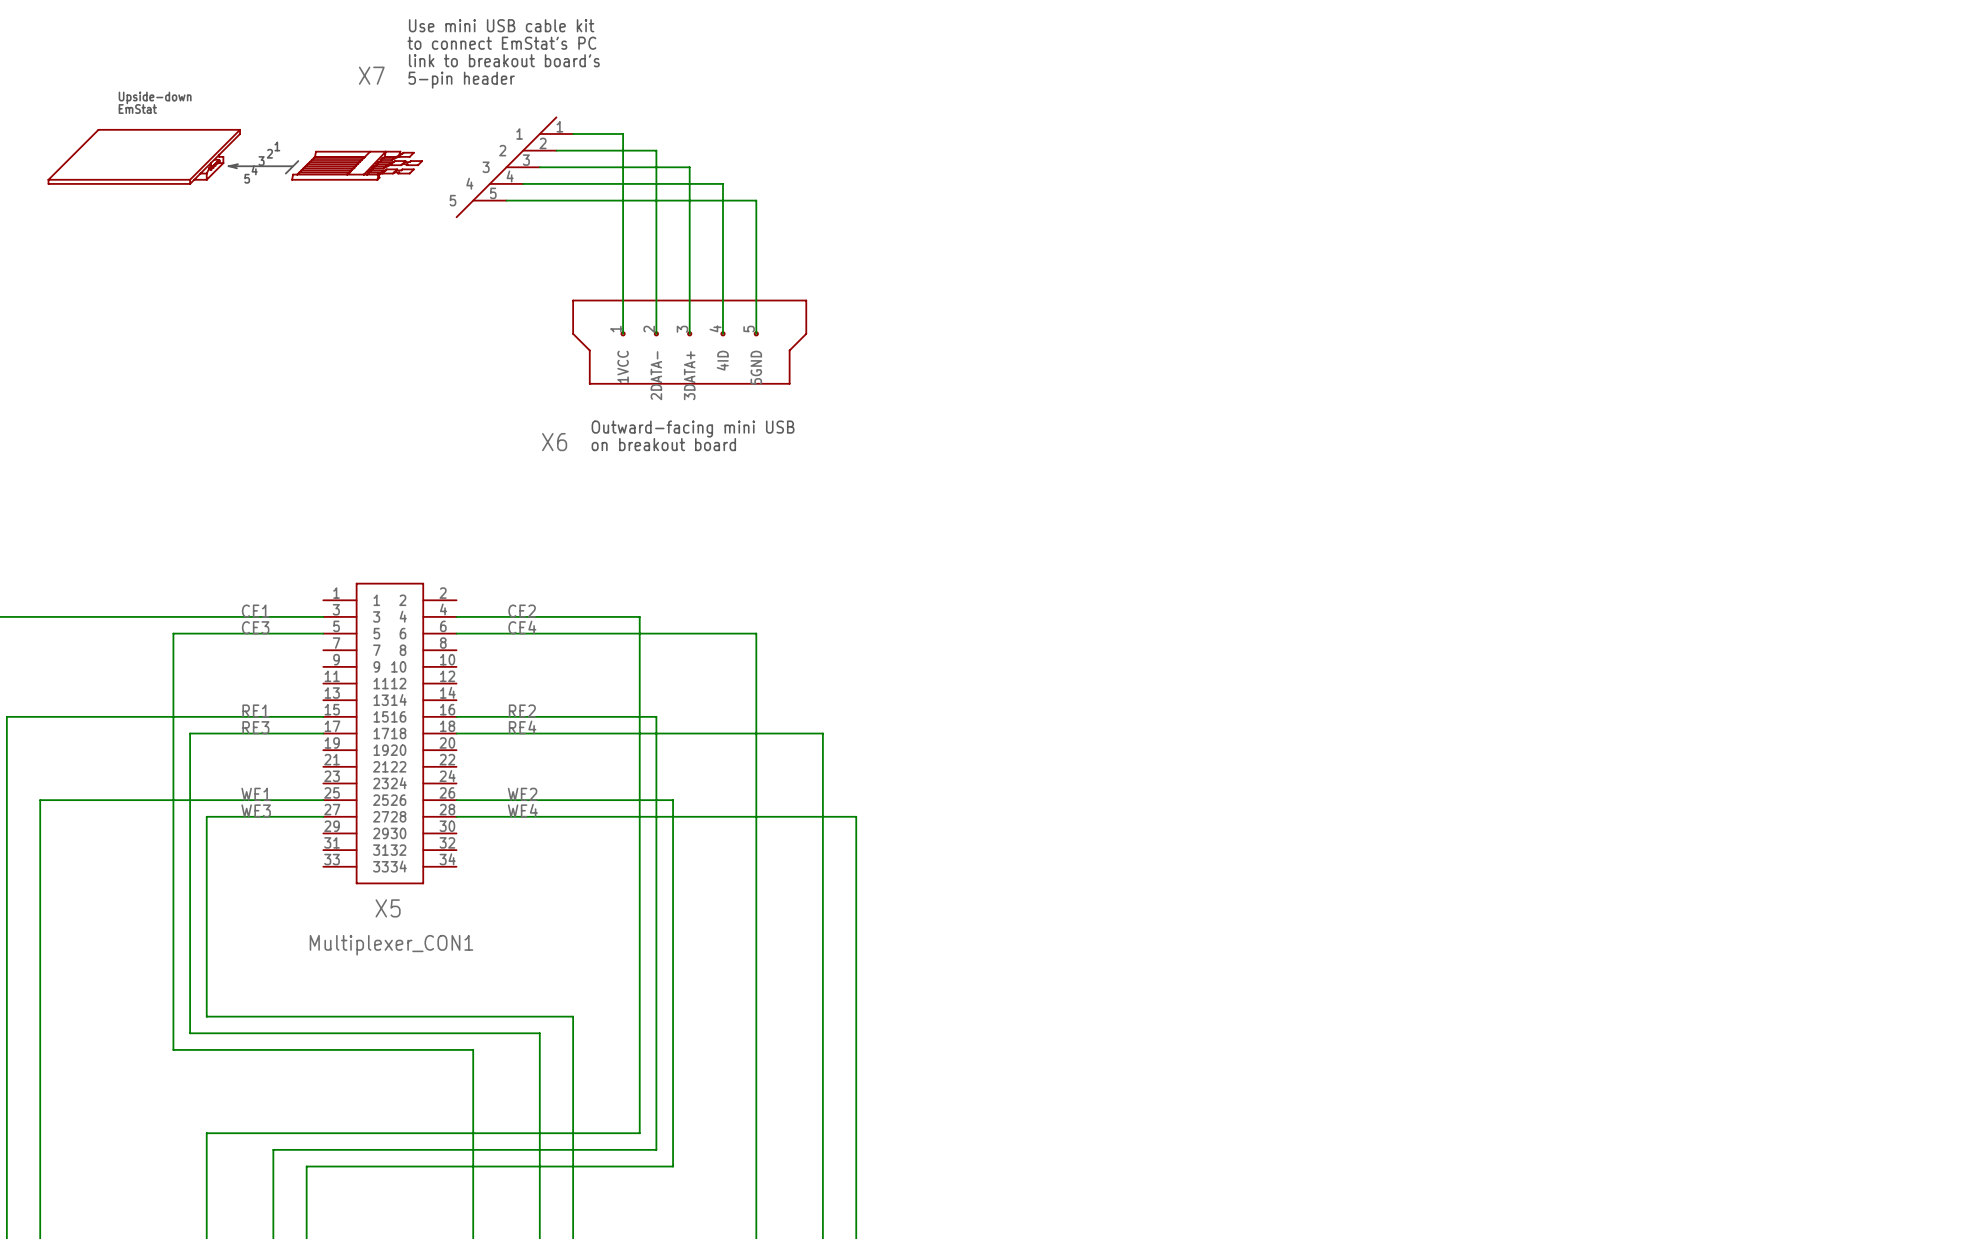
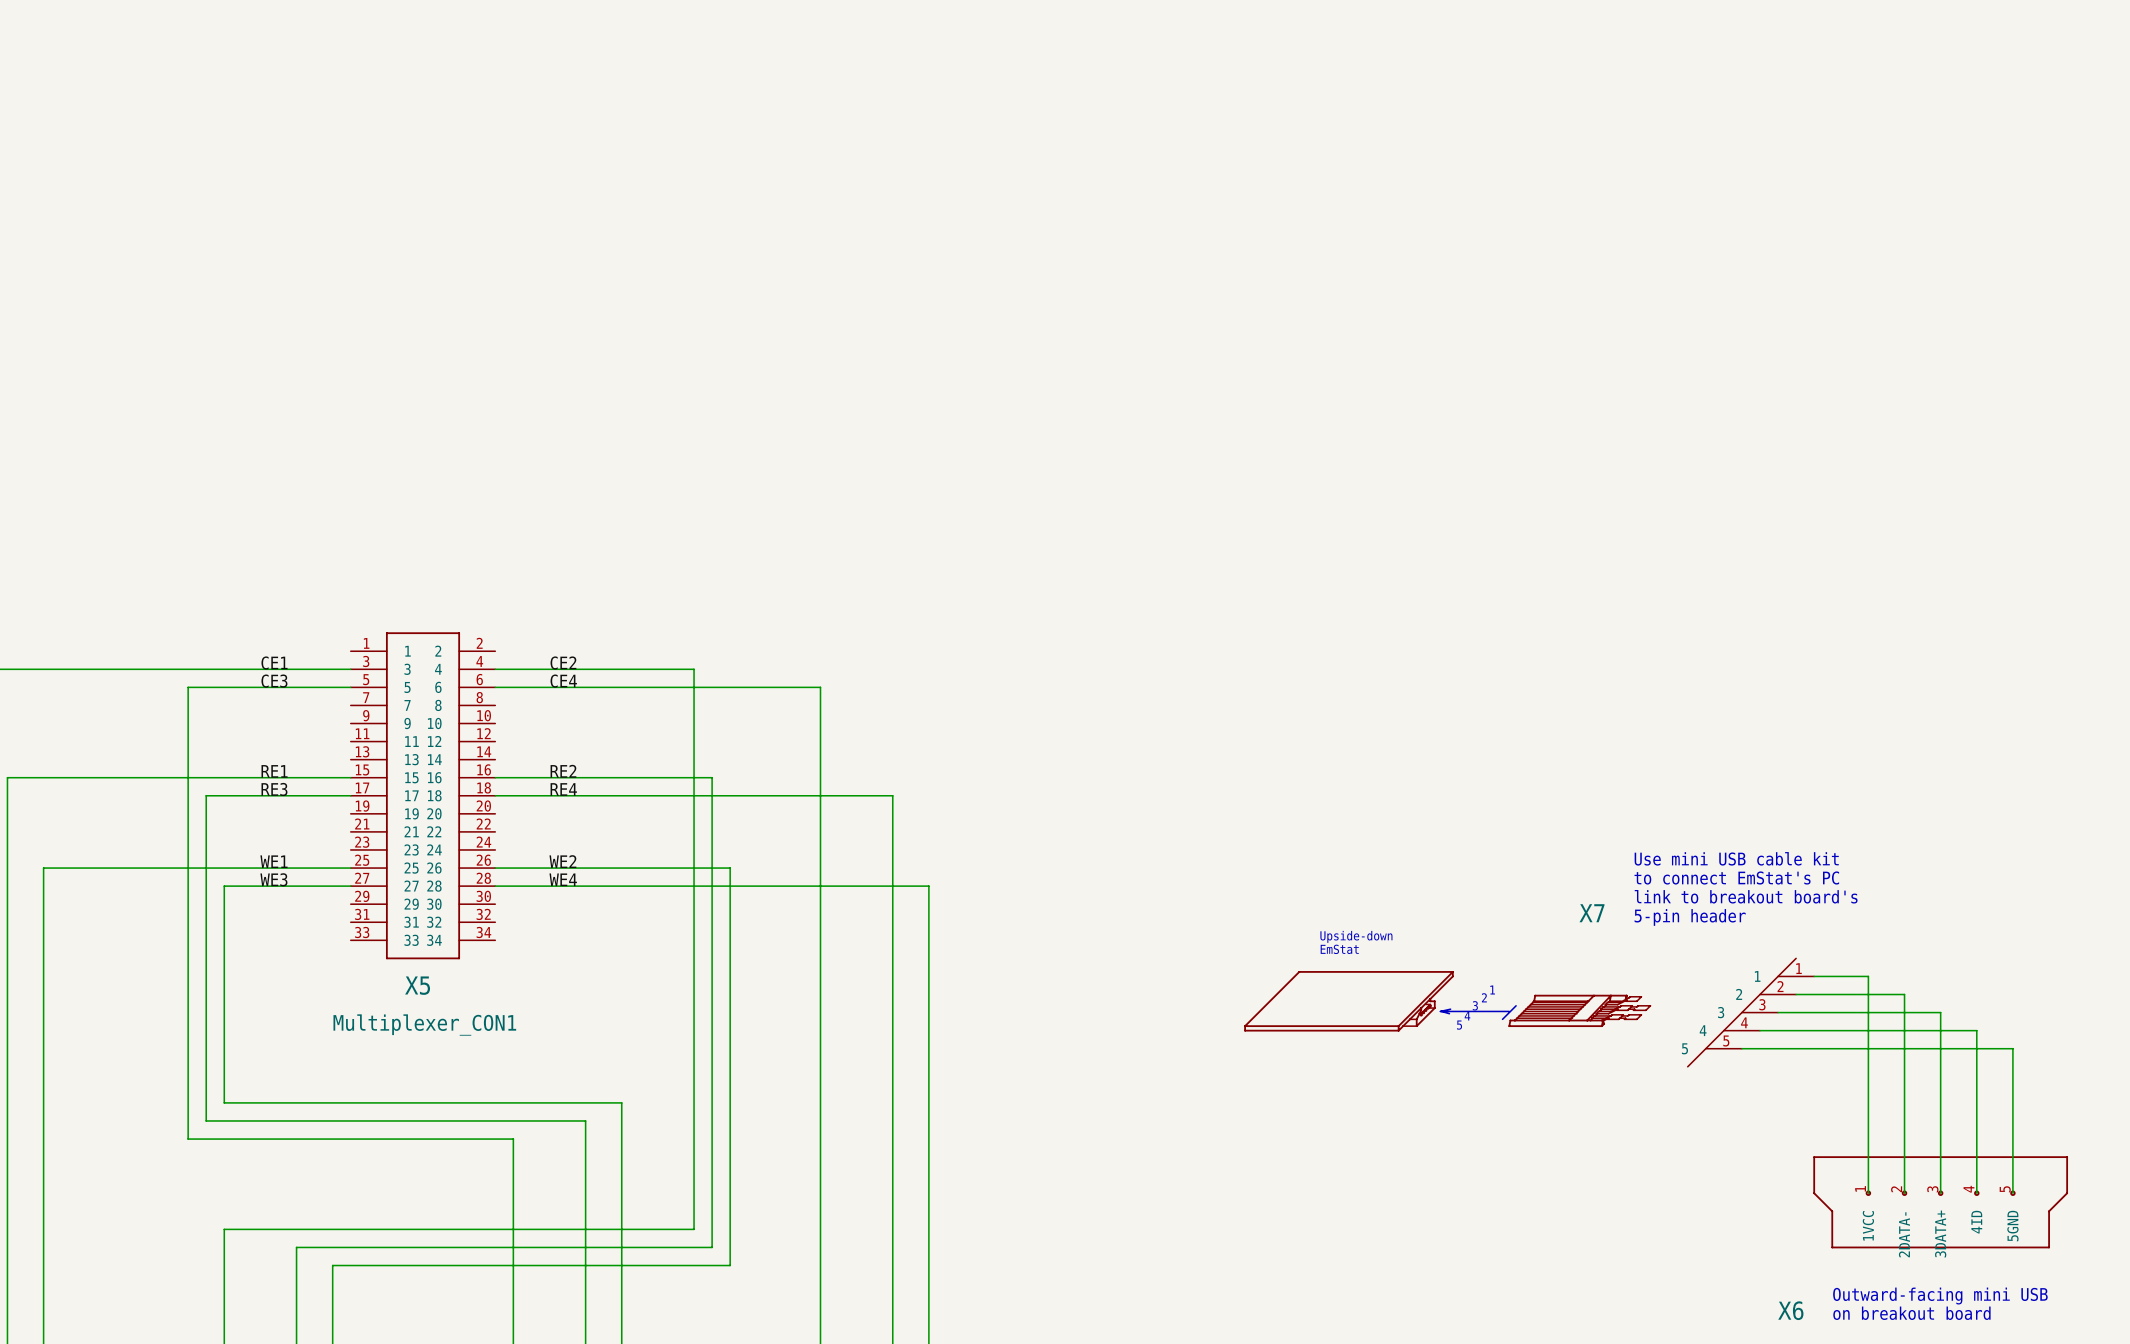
text: Use mini USB cable kit (501, 25) -> none
text: to connect EmStat's PC (501, 43) -> none
text: link to breakout board's (504, 60) -> none
text: 5-pin header (461, 80) -> none
wire: (573, 133) (623, 133) (623, 333) -> none
wire: (556, 150) (656, 150) (656, 333) -> none
X7 position: (310, 167) -> (1529, 1012)
wire: (539, 167) (689, 167) (689, 333) -> none
wire: (523, 183) (723, 183) (723, 333) -> none
wire: (506, 200) (756, 200) (756, 333) -> none
X6 position: (689, 342) -> (1940, 1202)
text: Outward-facing mini USB (693, 429) -> none
text: on breakout board (663, 444) -> none
text: none -> Use mini USB cable kit (1736, 858)
text: none -> to connect EmStat's PC (1736, 877)
text: none -> link to breakout board's (1746, 896)
text: none -> 5-pin header (1690, 917)
wire: none -> (1814, 976) (1868, 976) (1868, 1193)
wire: none -> (1796, 994) (1904, 994) (1904, 1193)
wire: none -> (1778, 1012) (1940, 1012) (1940, 1193)
wire: none -> (1759, 1030) (1976, 1030) (1976, 1193)
wire: none -> (1741, 1048) (2012, 1048) (2012, 1193)
text: none -> Outward-facing mini USB (1940, 1296)
text: none -> on breakout board (1911, 1313)

